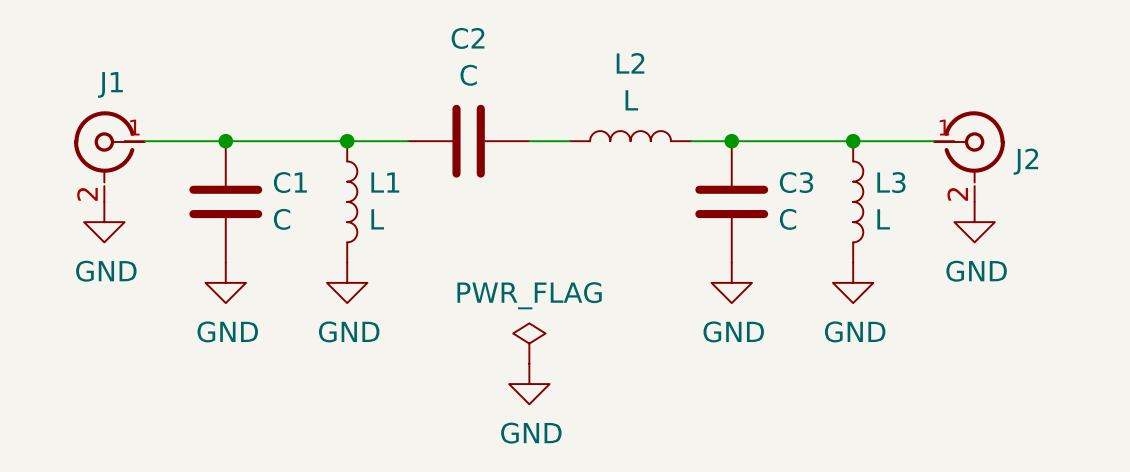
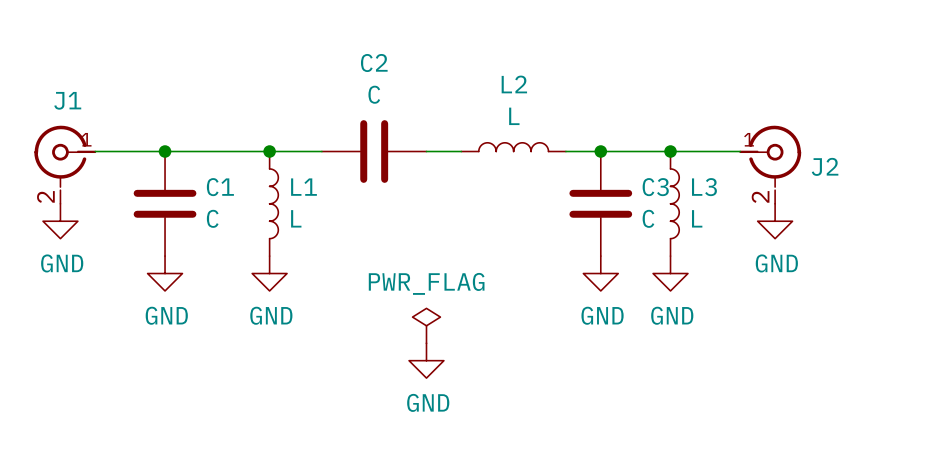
junction position: (853, 141) -> (670, 151)
J2 position: (969, 156) -> (770, 164)
L3 position: (858, 201) -> (674, 203)
power symbol position: GND (974, 222) -> GND (775, 221)
power symbol position: GND (853, 282) -> GND (670, 273)

